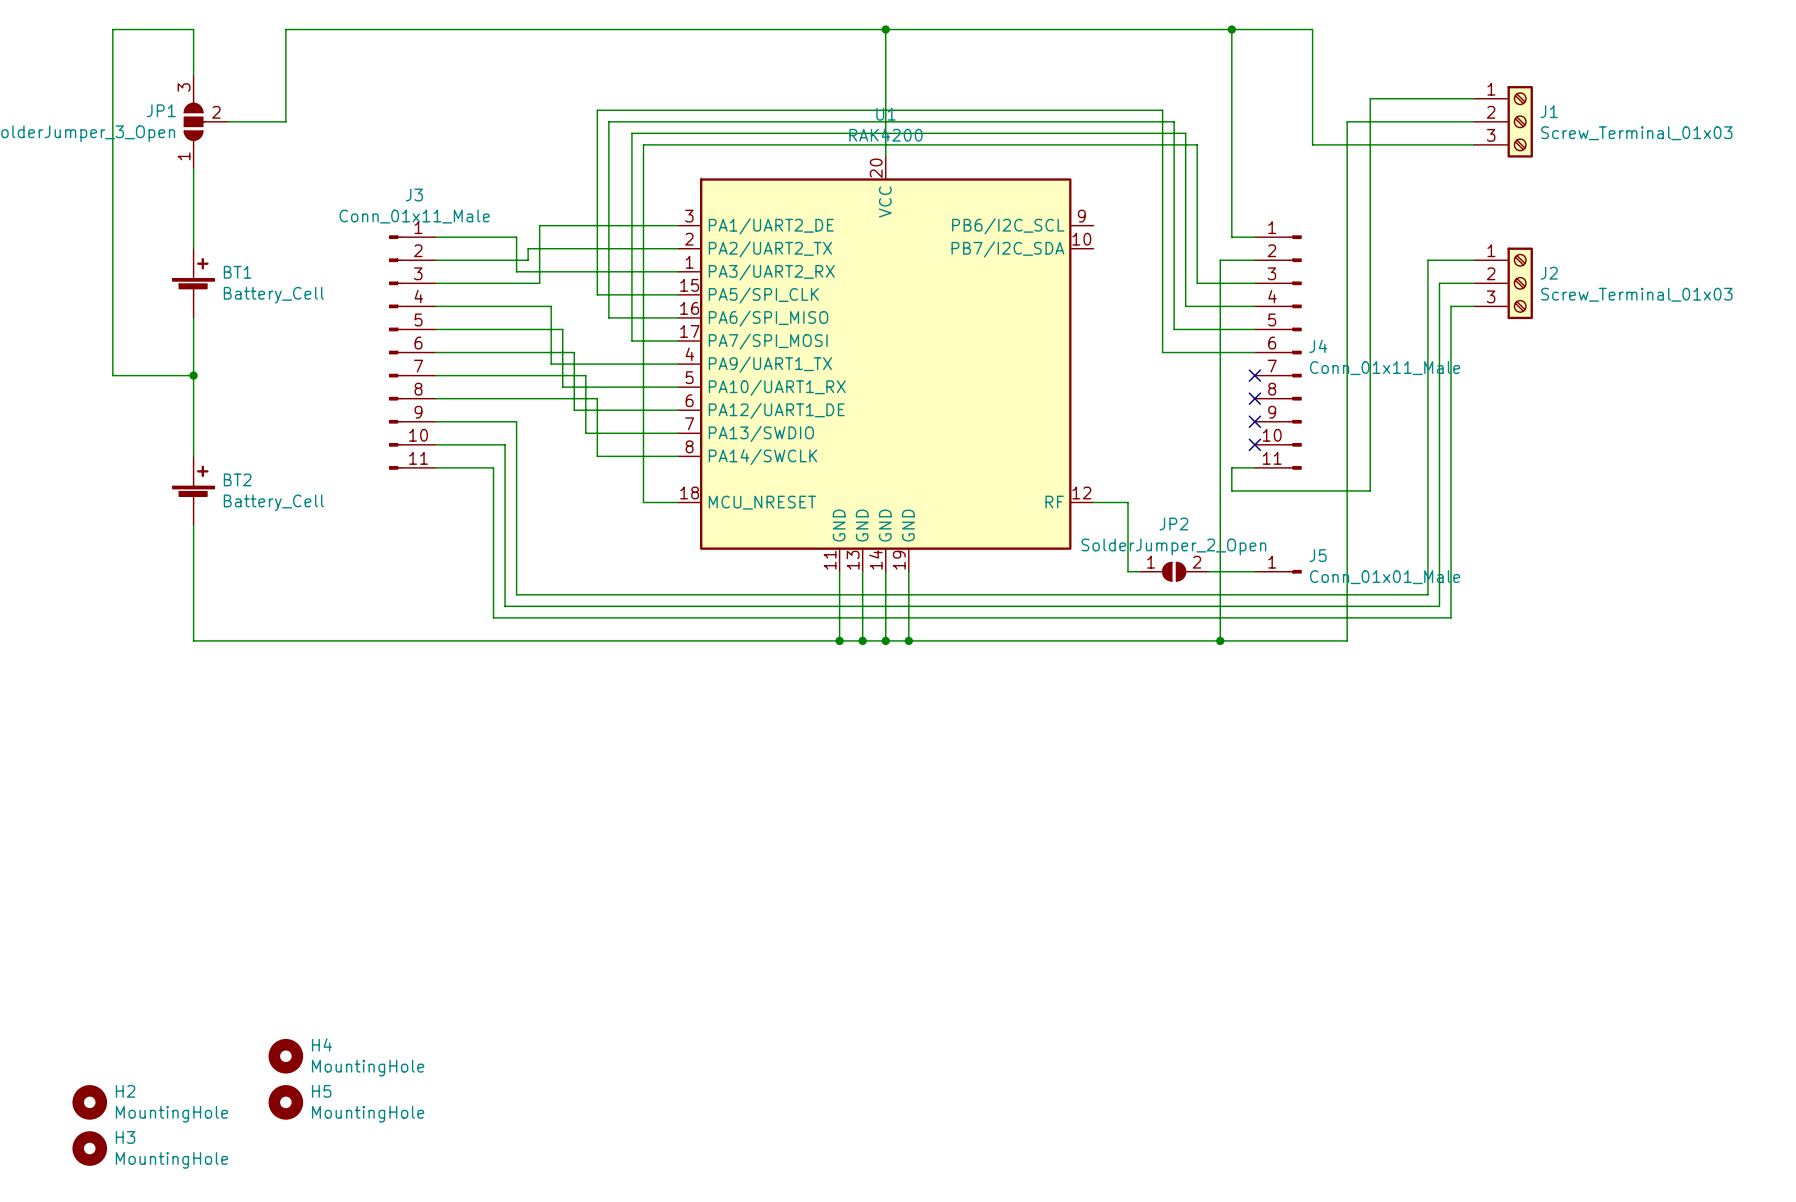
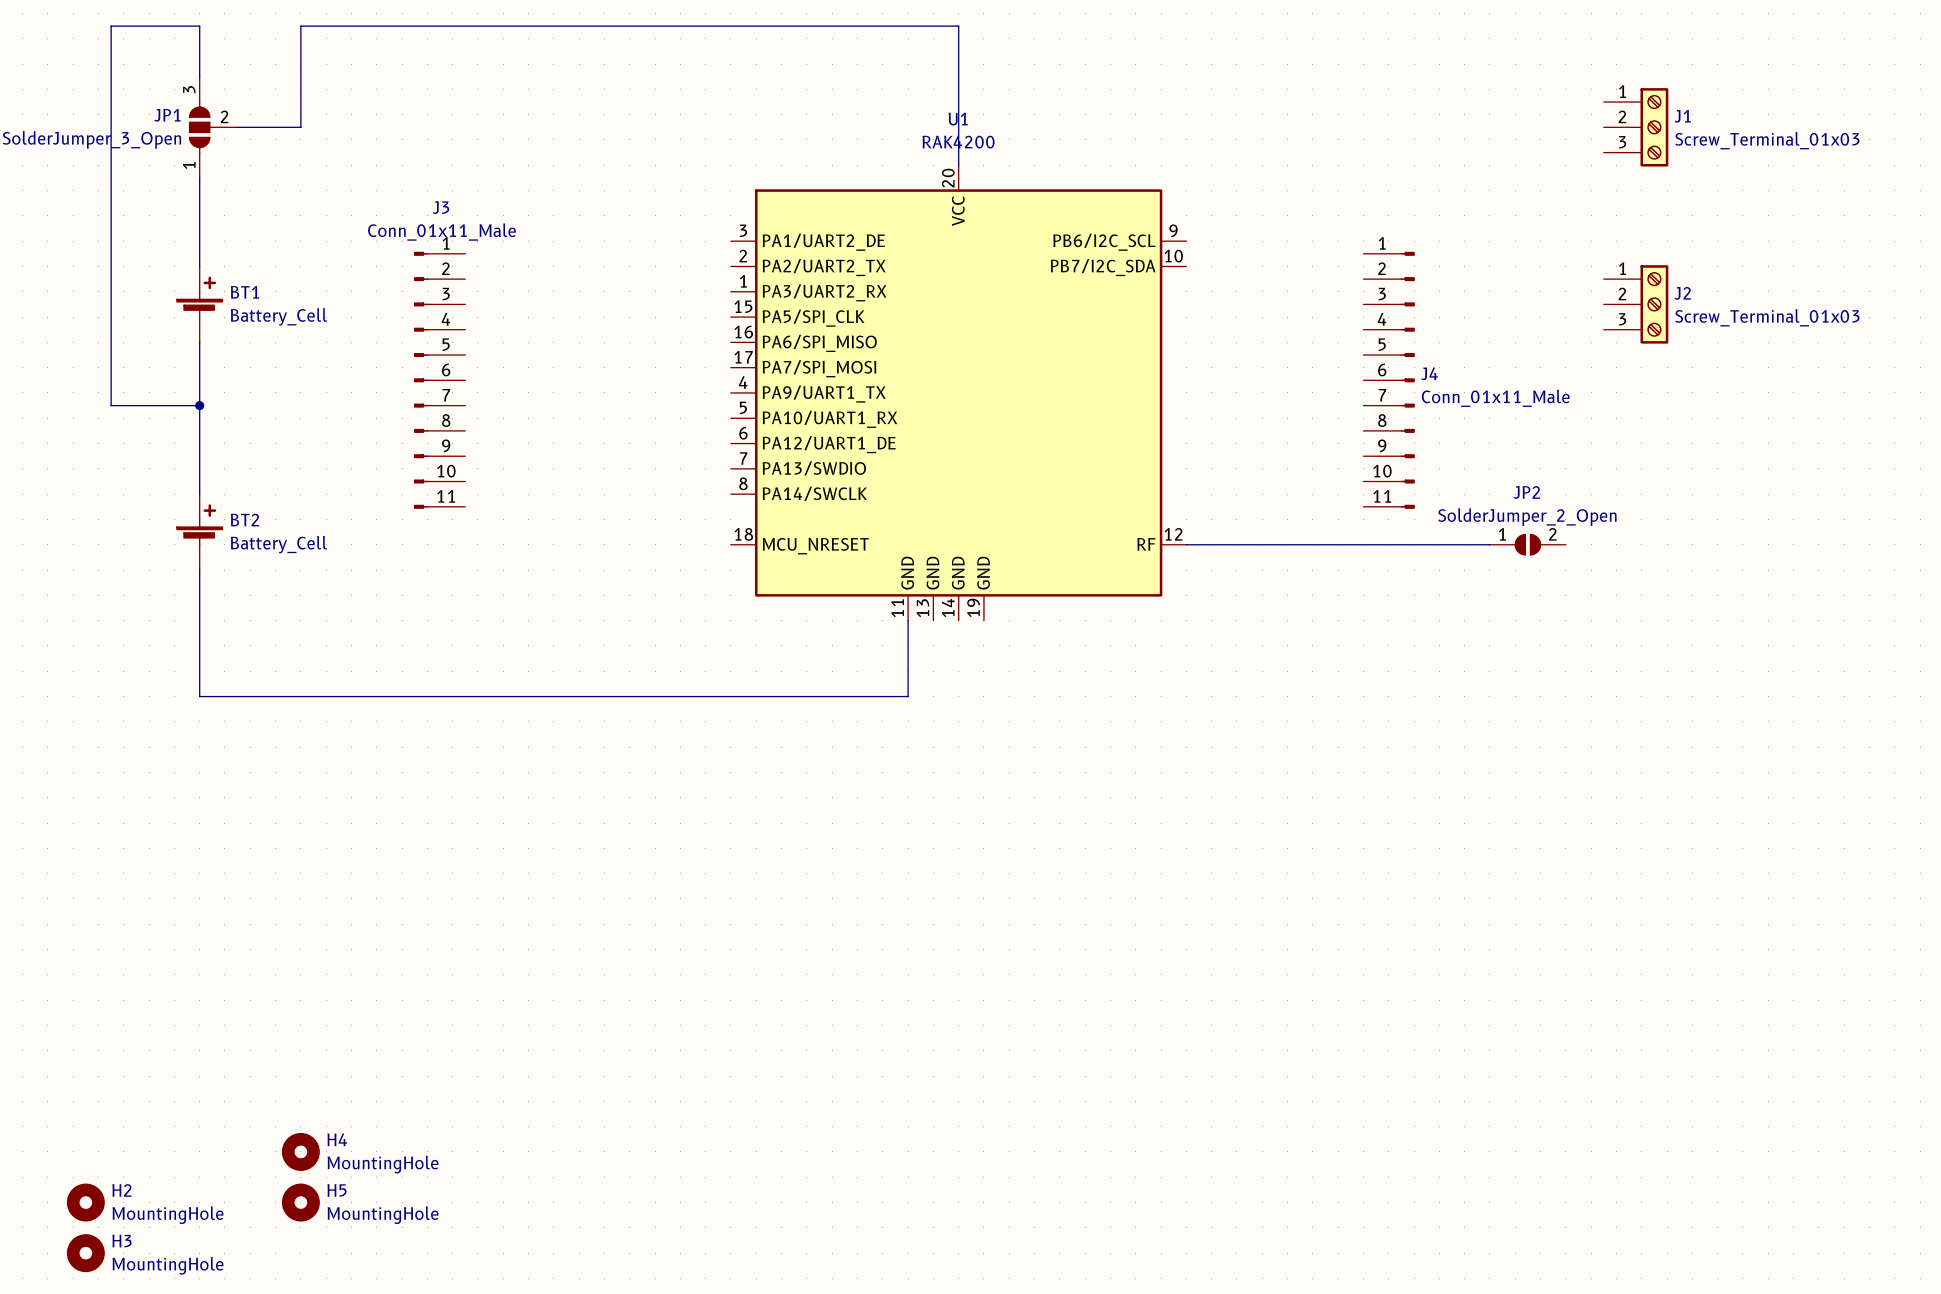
wire: (885, 29) (1312, 29) (1312, 144) (1474, 144) -> none
junction: (885, 29) -> none
wire: (1231, 29) (1231, 237) (1254, 237) -> none
junction: (1231, 29) -> none
wire: (1474, 98) (1370, 98) (1370, 490) (1231, 490) (1231, 467) (1254, 467) -> none
wire: (1474, 121) (1347, 121) (1347, 640) (839, 640) -> none
wire: (678, 225) (539, 225) (539, 283) (435, 283) -> none
wire: (435, 237) (516, 237) (516, 271) (678, 271) -> none
wire: (678, 248) (528, 248) (528, 260) (435, 260) -> none
wire: (1254, 260) (1220, 260) (1220, 640) -> none
wire: (1474, 260) (1427, 260) (1427, 594) (516, 594) (516, 421) (435, 421) -> none
wire: (1254, 283) (1197, 283) (1197, 144) (643, 144) (643, 502) (678, 502) -> none
wire: (1474, 283) (1439, 283) (1439, 606) (505, 606) (505, 444) (435, 444) -> none
wire: (678, 294) (597, 294) (597, 110) (1162, 110) (1162, 352) (1254, 352) -> none
wire: (435, 306) (551, 306) (551, 364) (678, 364) -> none
wire: (1254, 306) (1185, 306) (1185, 133) (631, 133) (631, 341) (678, 341) -> none
wire: (1474, 306) (1451, 306) (1451, 617) (493, 617) (493, 467) (435, 467) -> none
wire: (678, 317) (608, 317) (608, 121) (1174, 121) (1174, 329) (1254, 329) -> none
wire: (435, 329) (562, 329) (562, 387) (678, 387) -> none
wire: (435, 352) (574, 352) (574, 410) (678, 410) -> none
wire: (435, 375) (585, 375) (585, 433) (678, 433) -> none
no-connect mark: (1254, 375) -> none
wire: (435, 398) (597, 398) (597, 456) (678, 456) -> none
no-connect mark: (1254, 398) -> none
no-connect mark: (1254, 421) -> none
no-connect mark: (1254, 444) -> none
wire: (1128, 502) (1128, 571) (1139, 571) -> (1224, 544) (1489, 544)
wire: (862, 571) (862, 640) -> none
wire: (885, 571) (885, 640) -> none
wire: (908, 571) (908, 640) -> none
JP2 position: (1174, 571) -> (1527, 544)
wire: (1208, 571) (1254, 571) -> none
J5: Conn_01x01_Male (1278, 571) -> none
junction: (839, 640) -> none
junction: (862, 640) -> none
junction: (885, 640) -> none
junction: (908, 640) -> none
junction: (1220, 640) -> none

